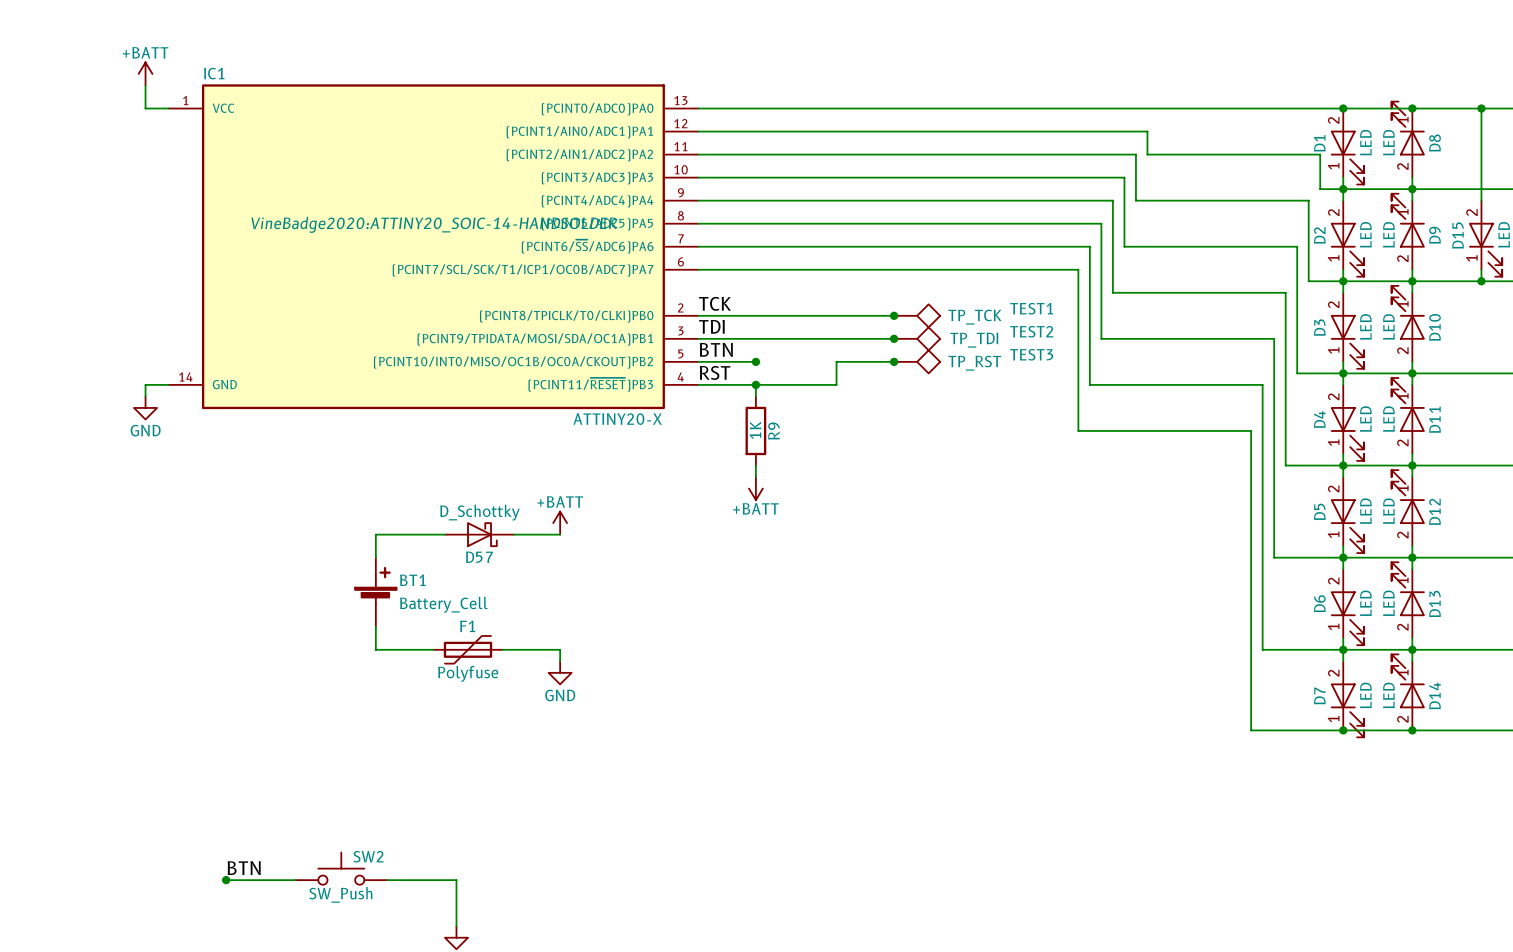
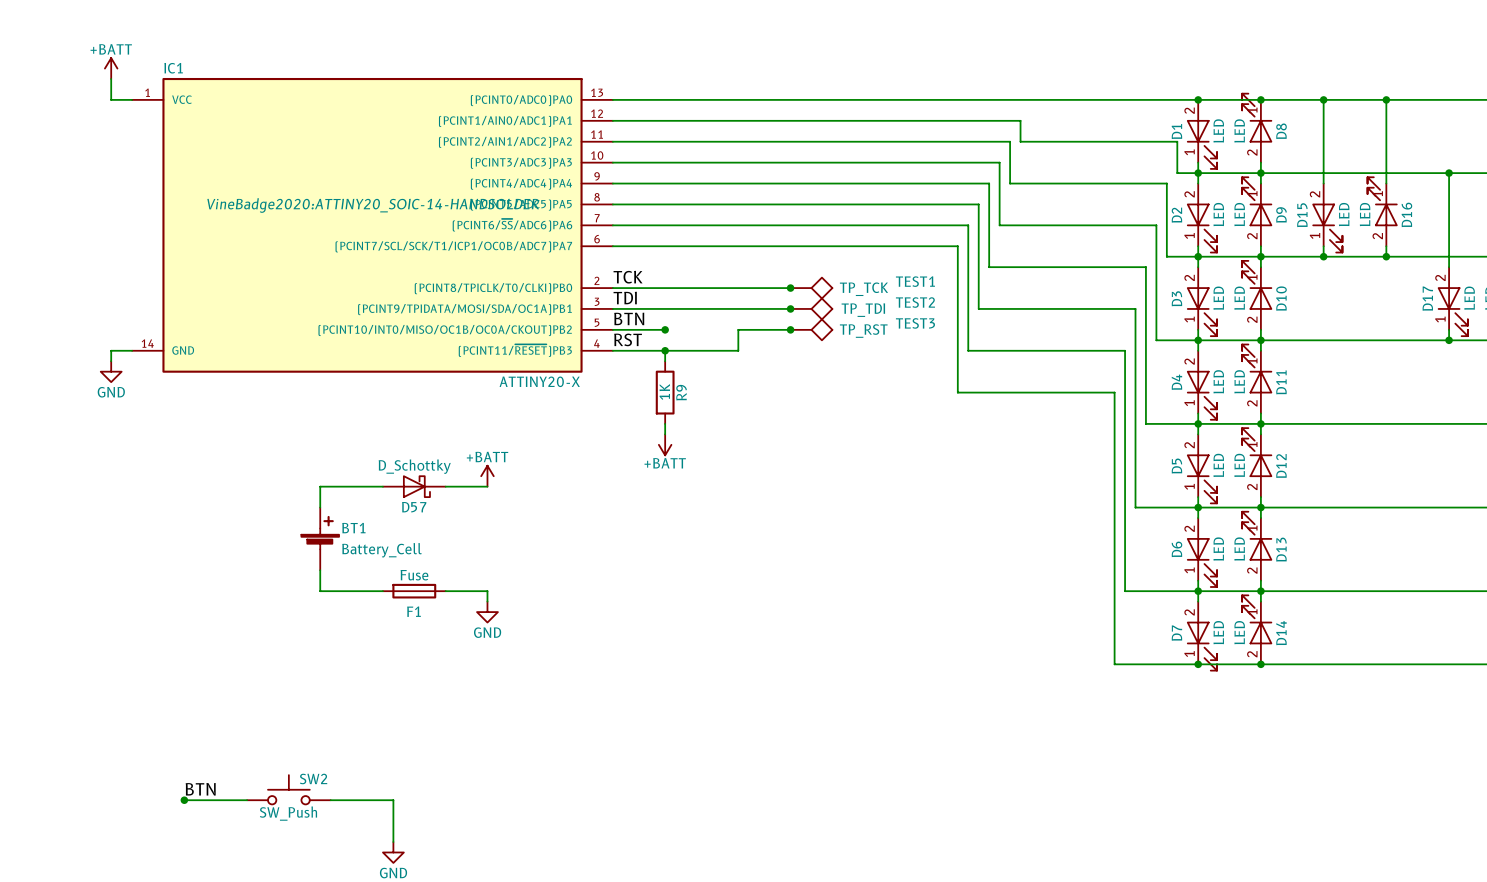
F1 name position: F1 (467, 626) -> F1 (414, 611)
F1 symbol: [433, 635, 503, 664] -> [382, 583, 446, 599]
F1 value: Polyfuse (468, 673) -> Fuse (414, 575)

